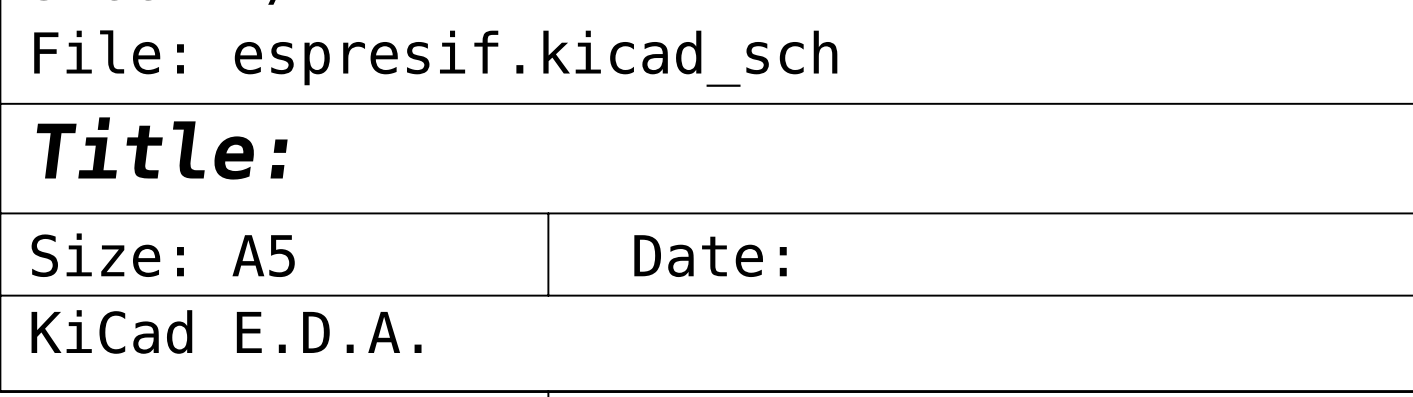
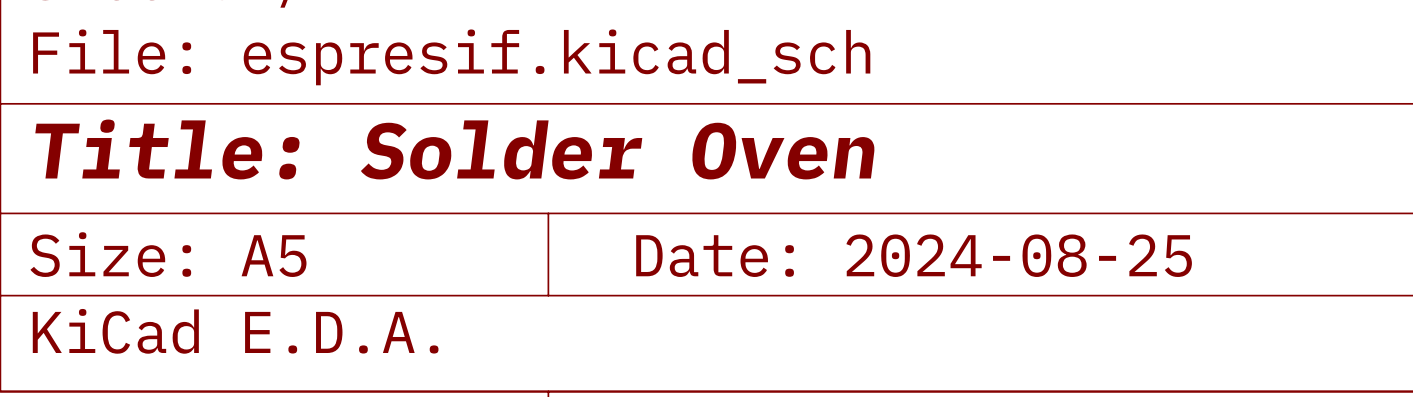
title block: Title: (162, 148) -> Title: Solder Oven (455, 149)
title block: Date: (710, 256) -> Date: 2024-08-25 (914, 255)

